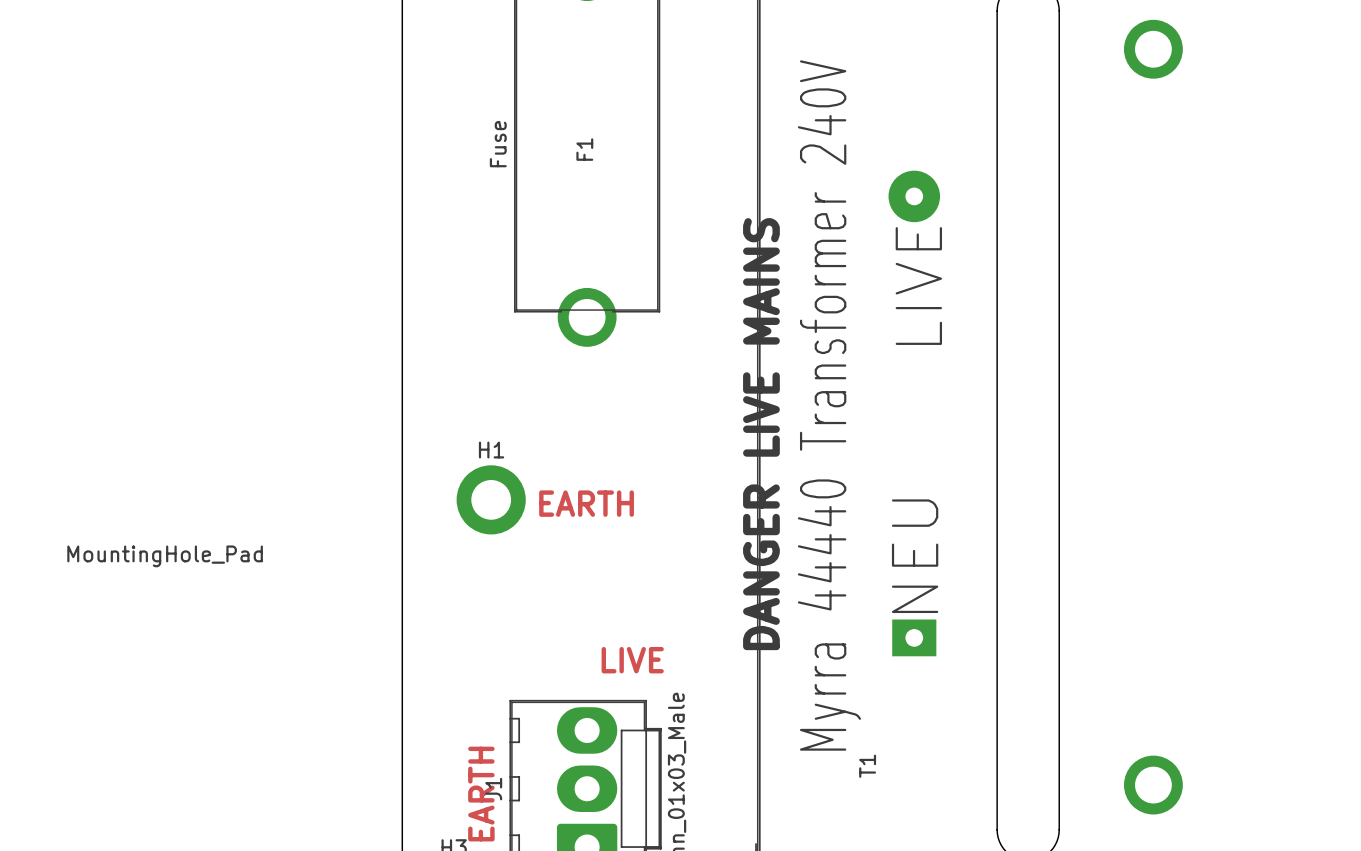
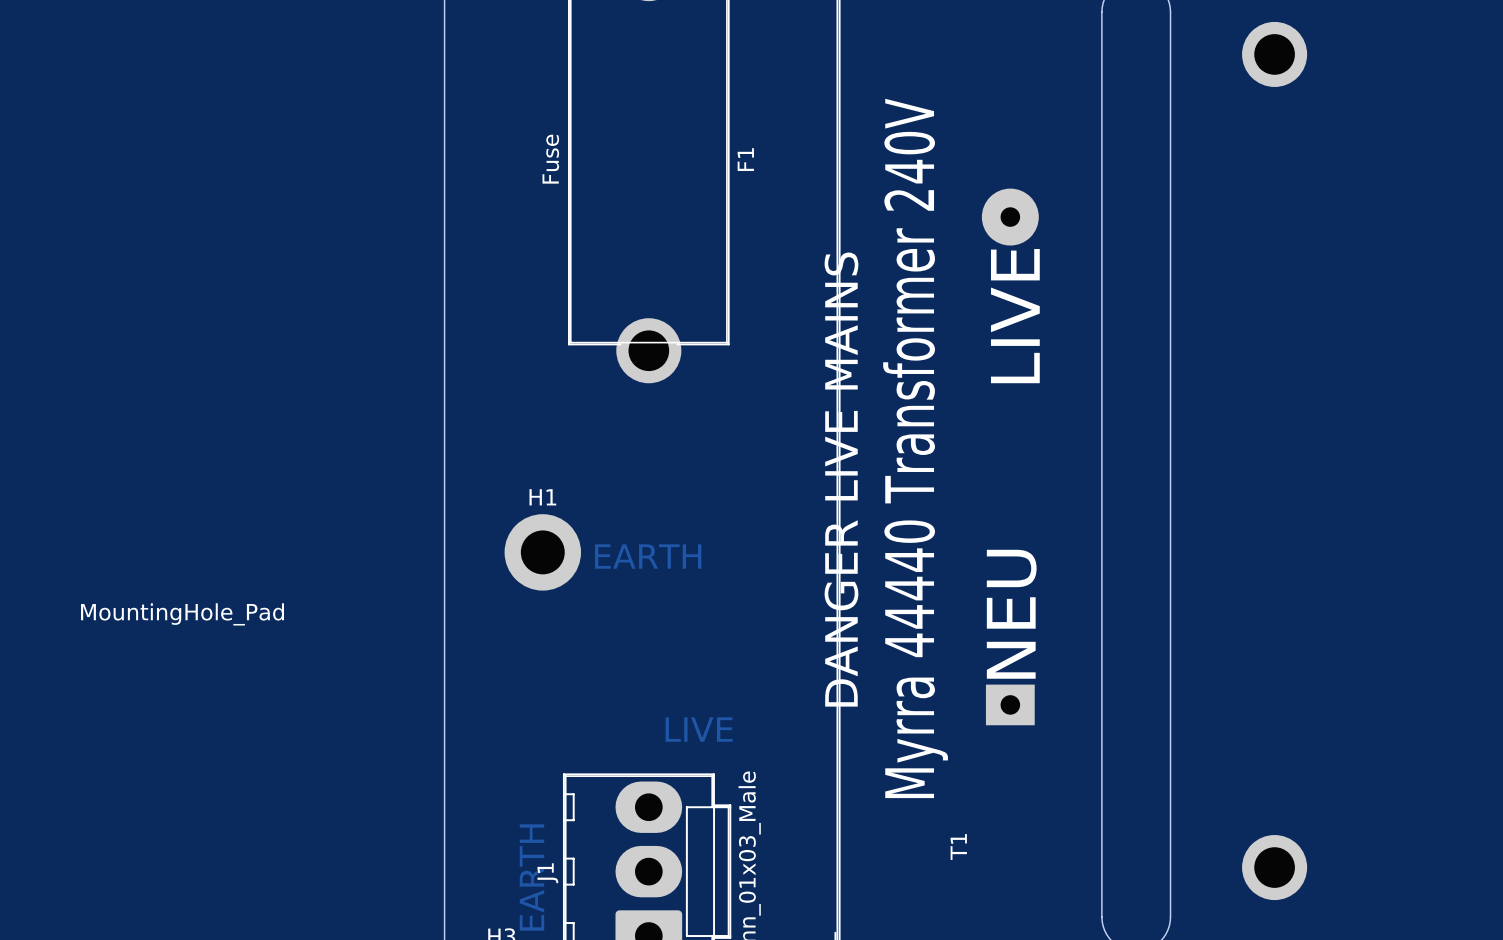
F1 name position: F1 (584, 149) -> F1 (745, 159)

